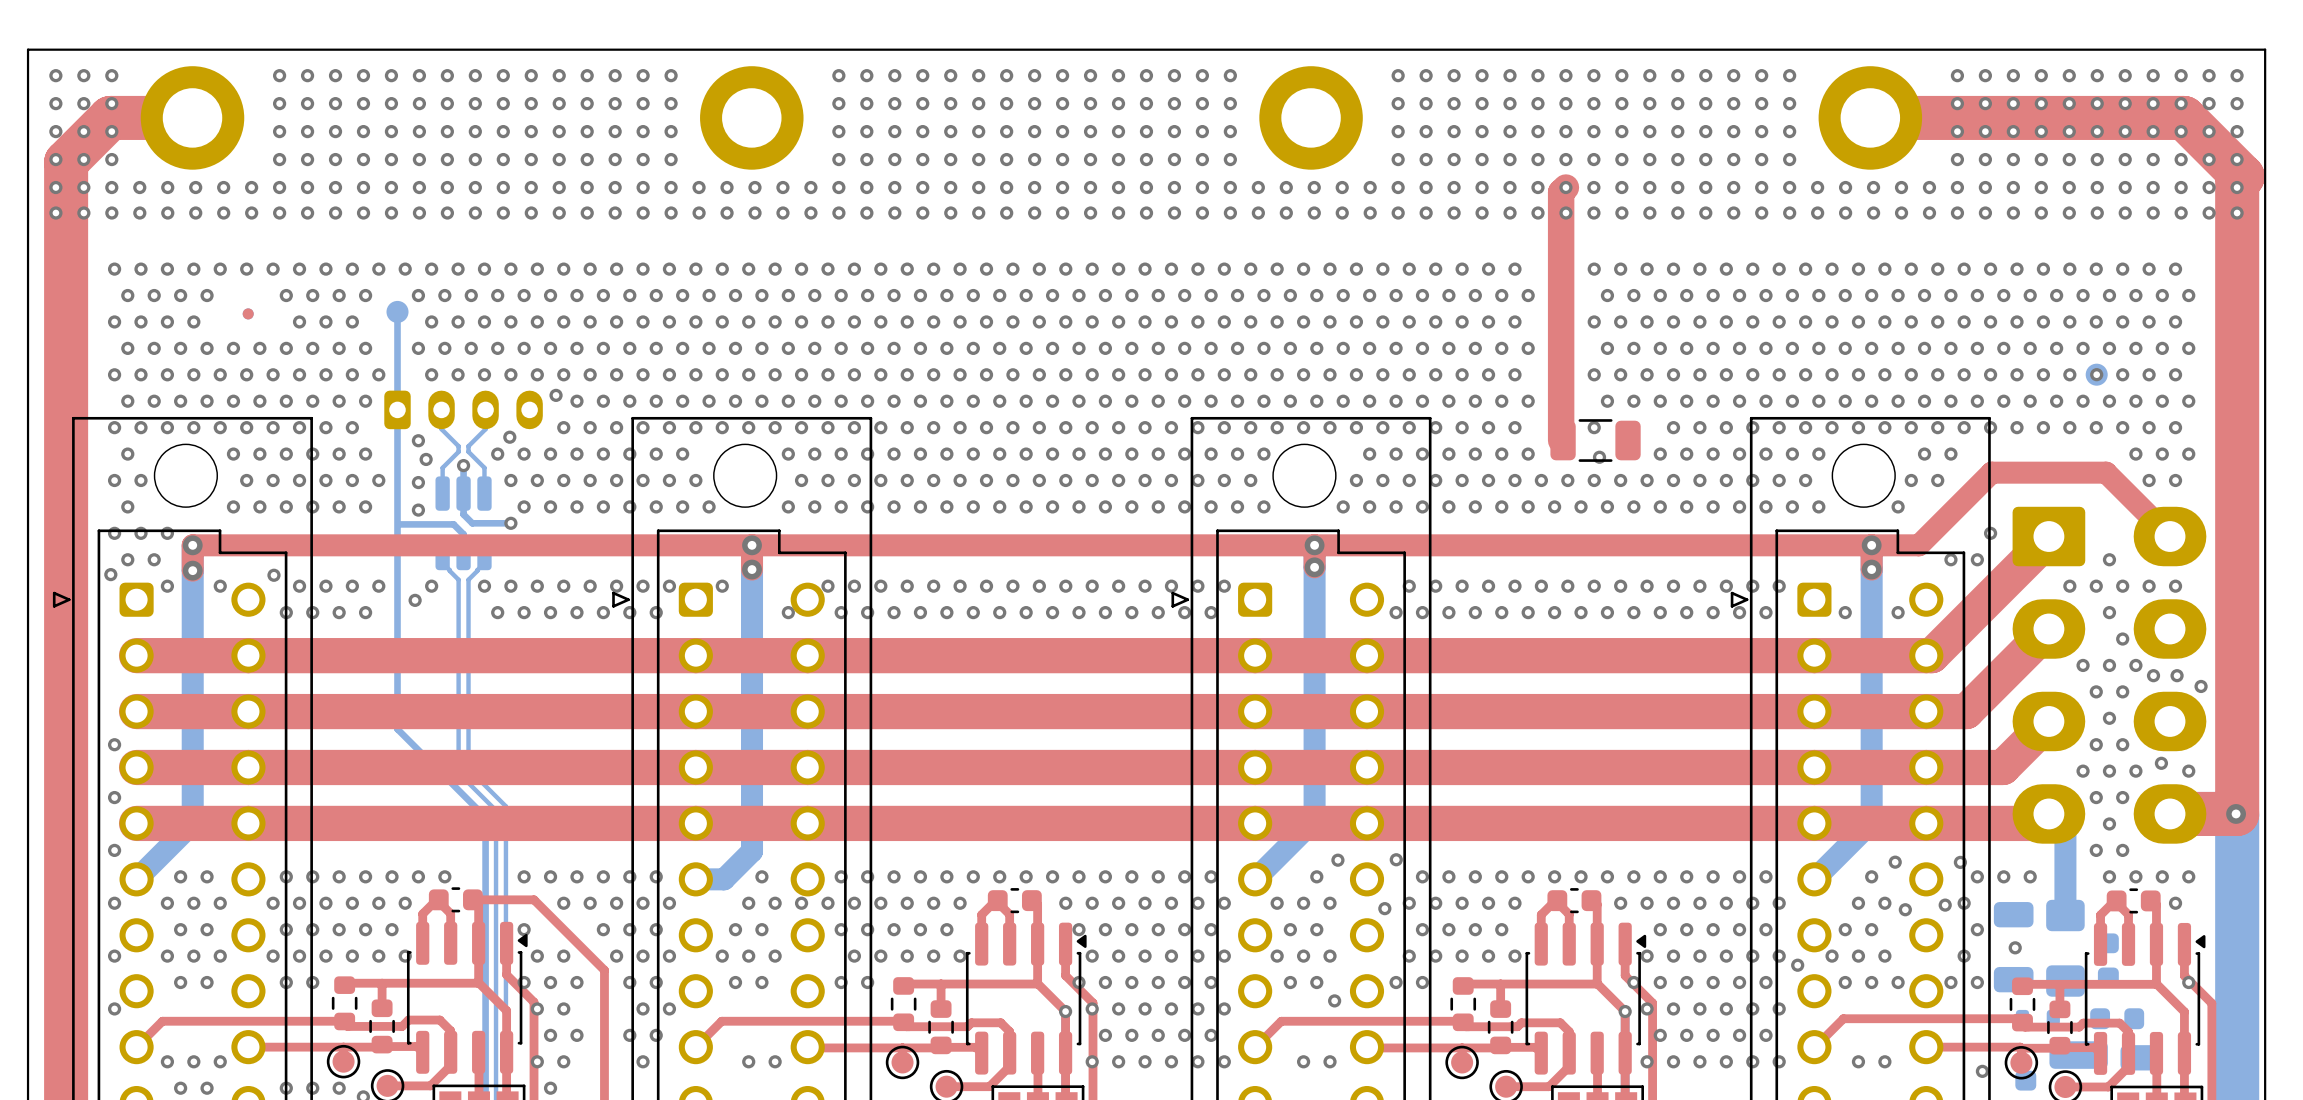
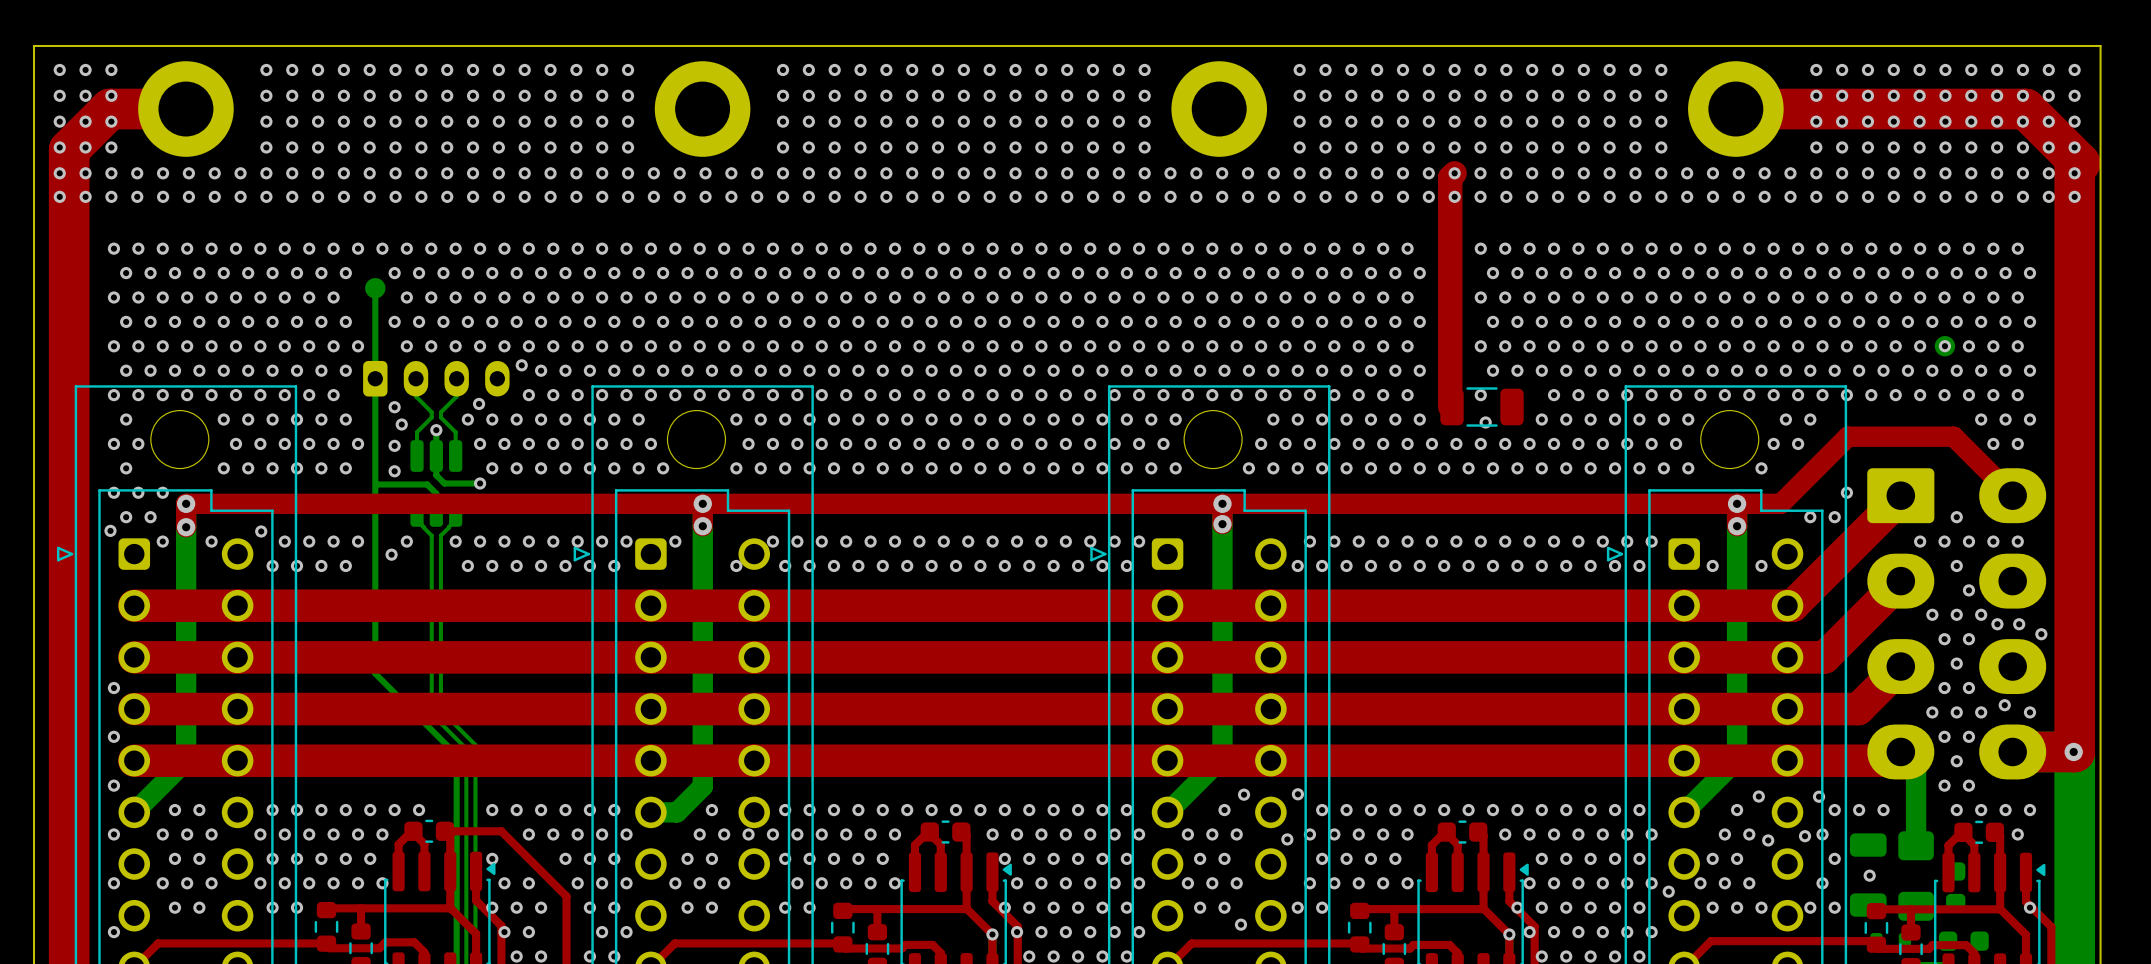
via: none -> (223, 273)
via: none -> (248, 273)
part: (248, 313) -> none
via: none -> (211, 297)
via: none -> (235, 297)
via: none -> (260, 297)

